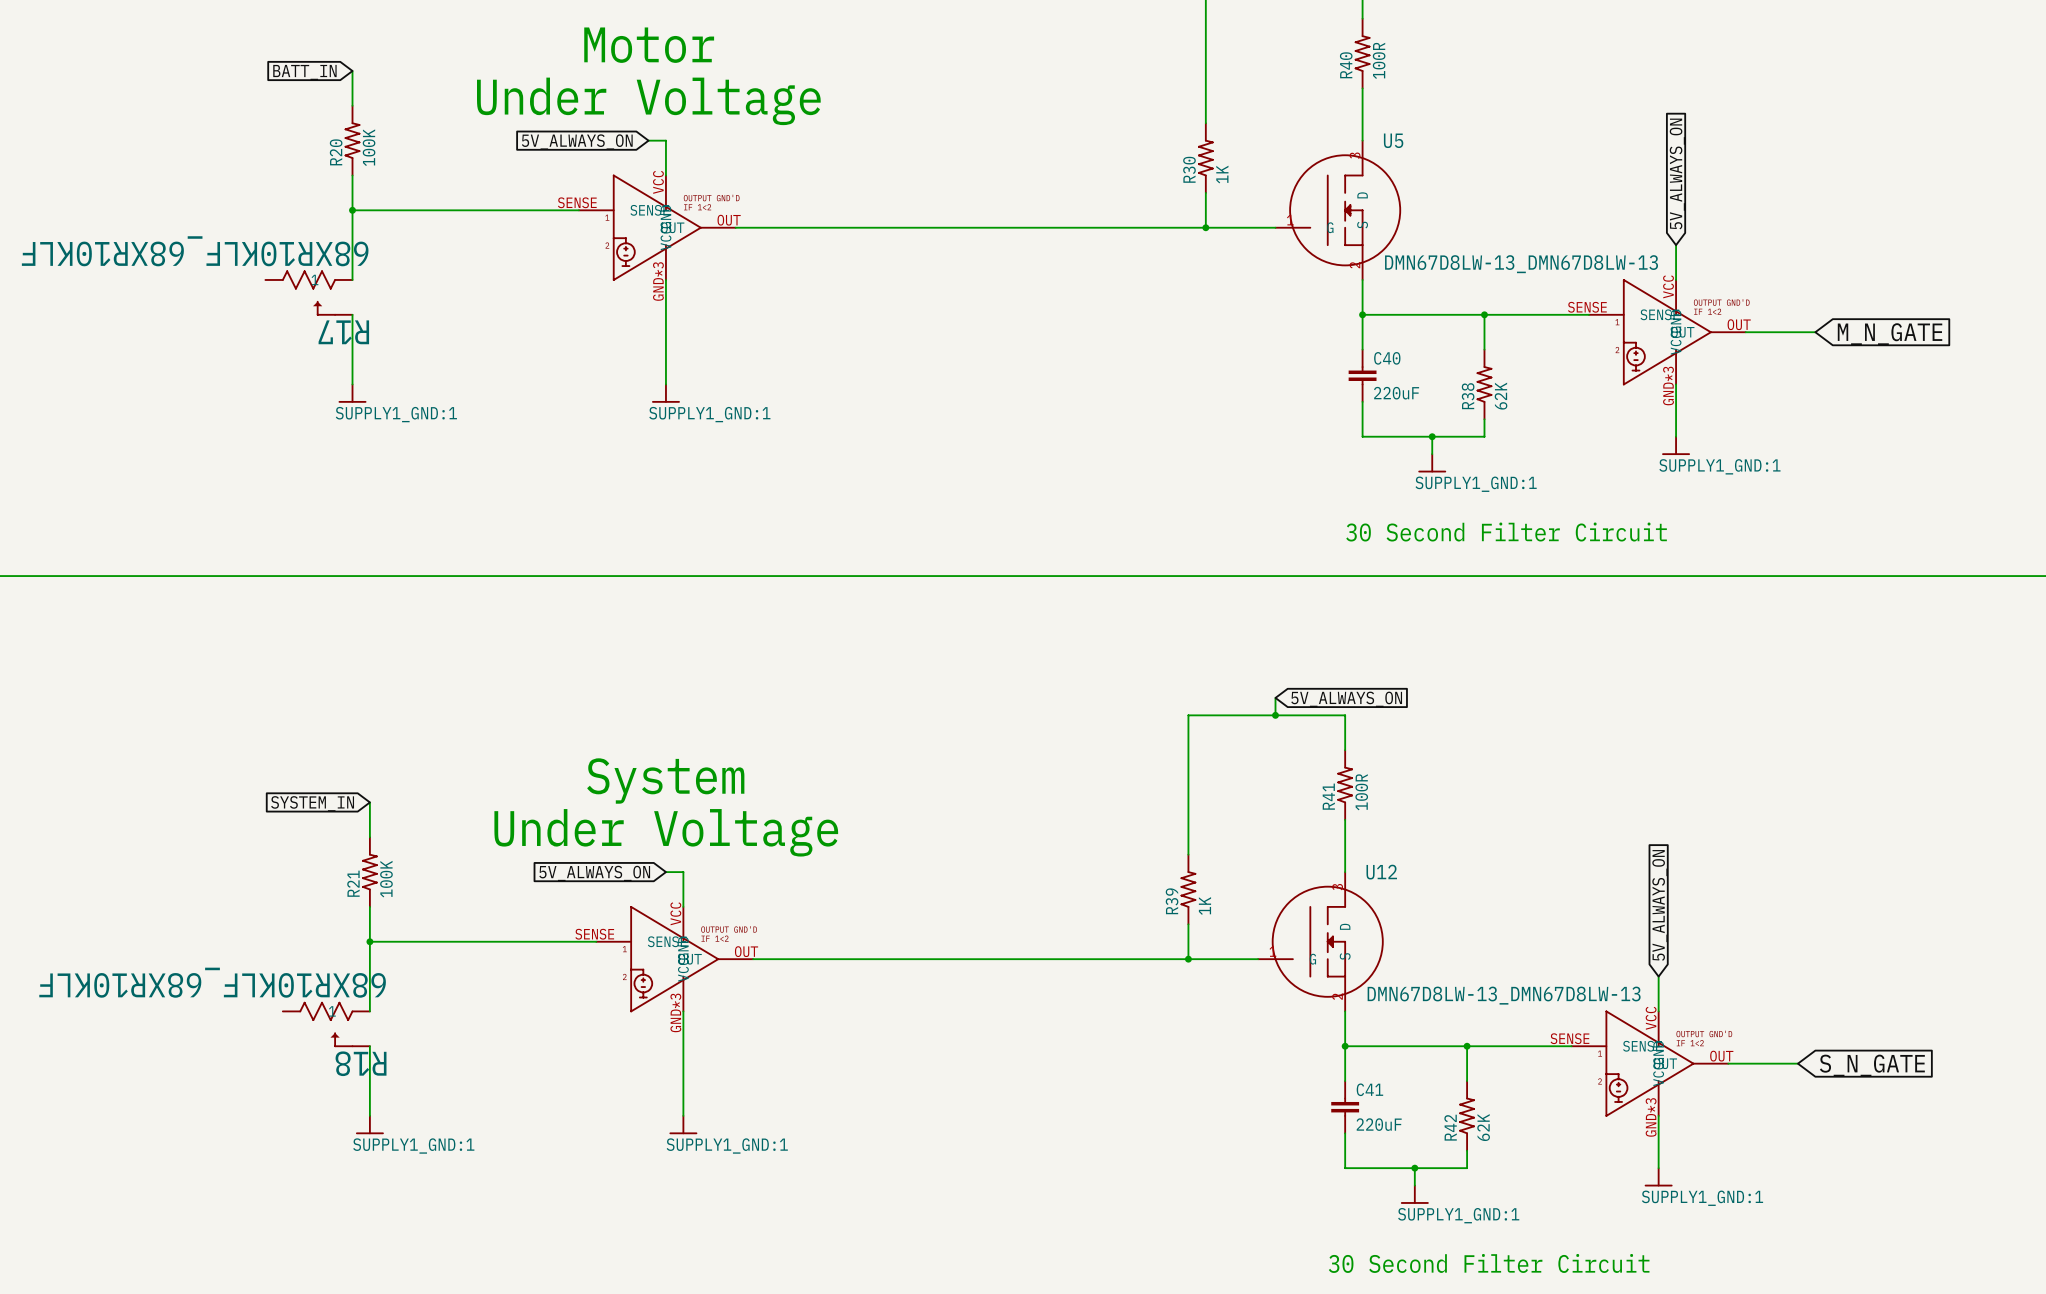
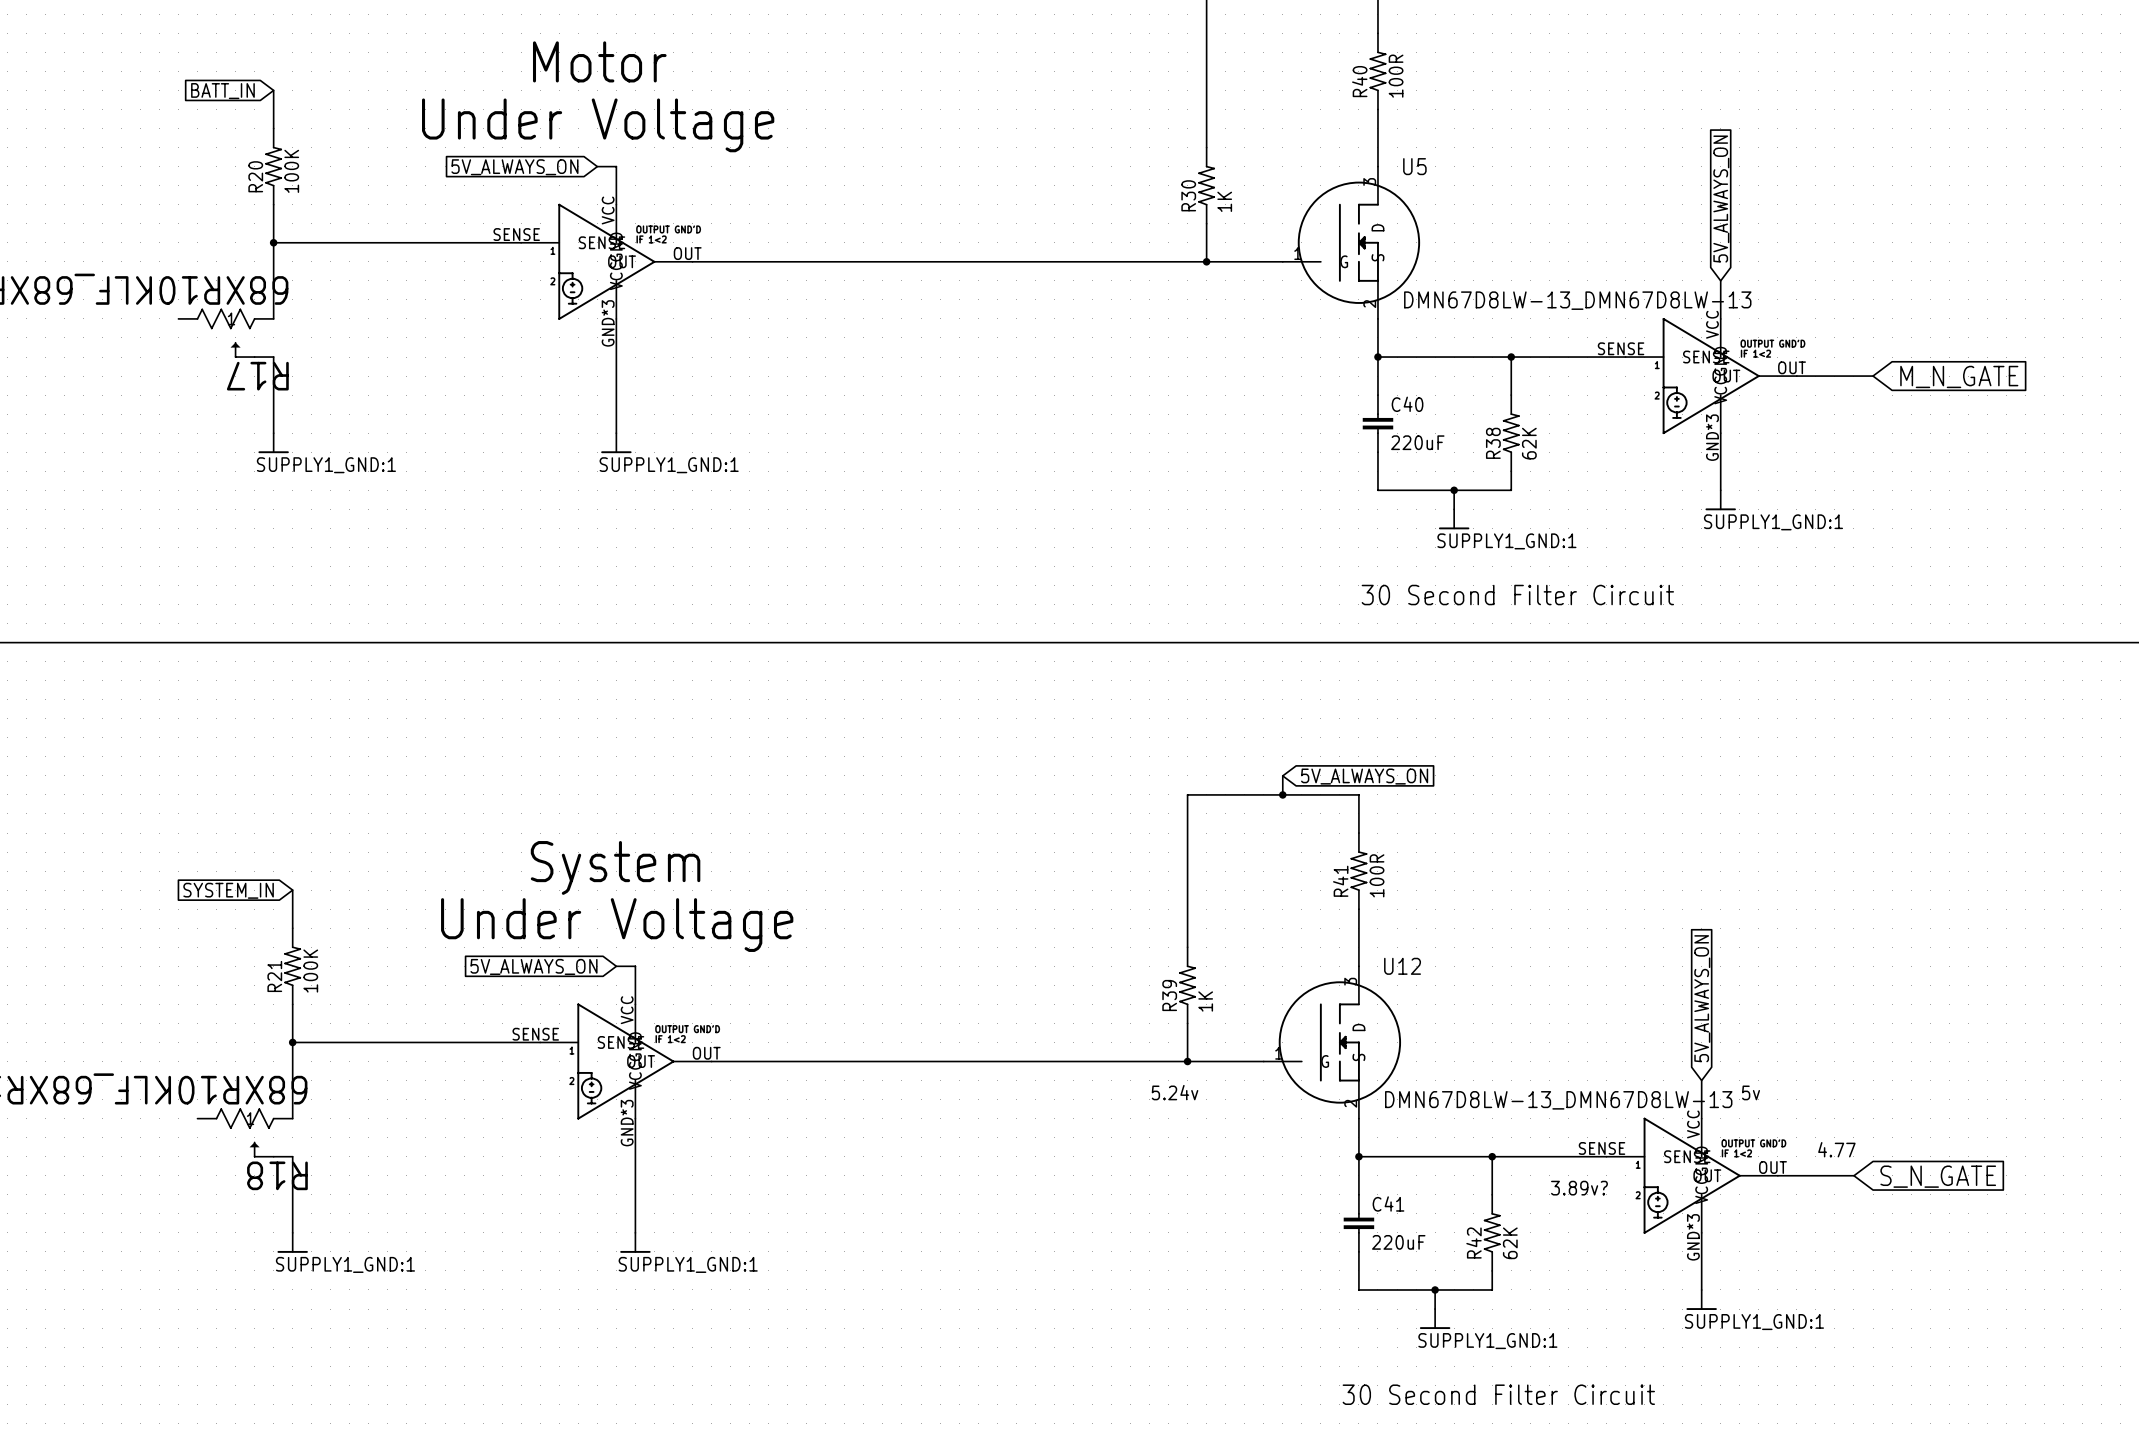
text: none -> 5.24v (1175, 1092)
text: none -> 5v (1751, 1092)
text: none -> 4.77 (1836, 1149)
text: none -> 3.89v? (1579, 1188)

